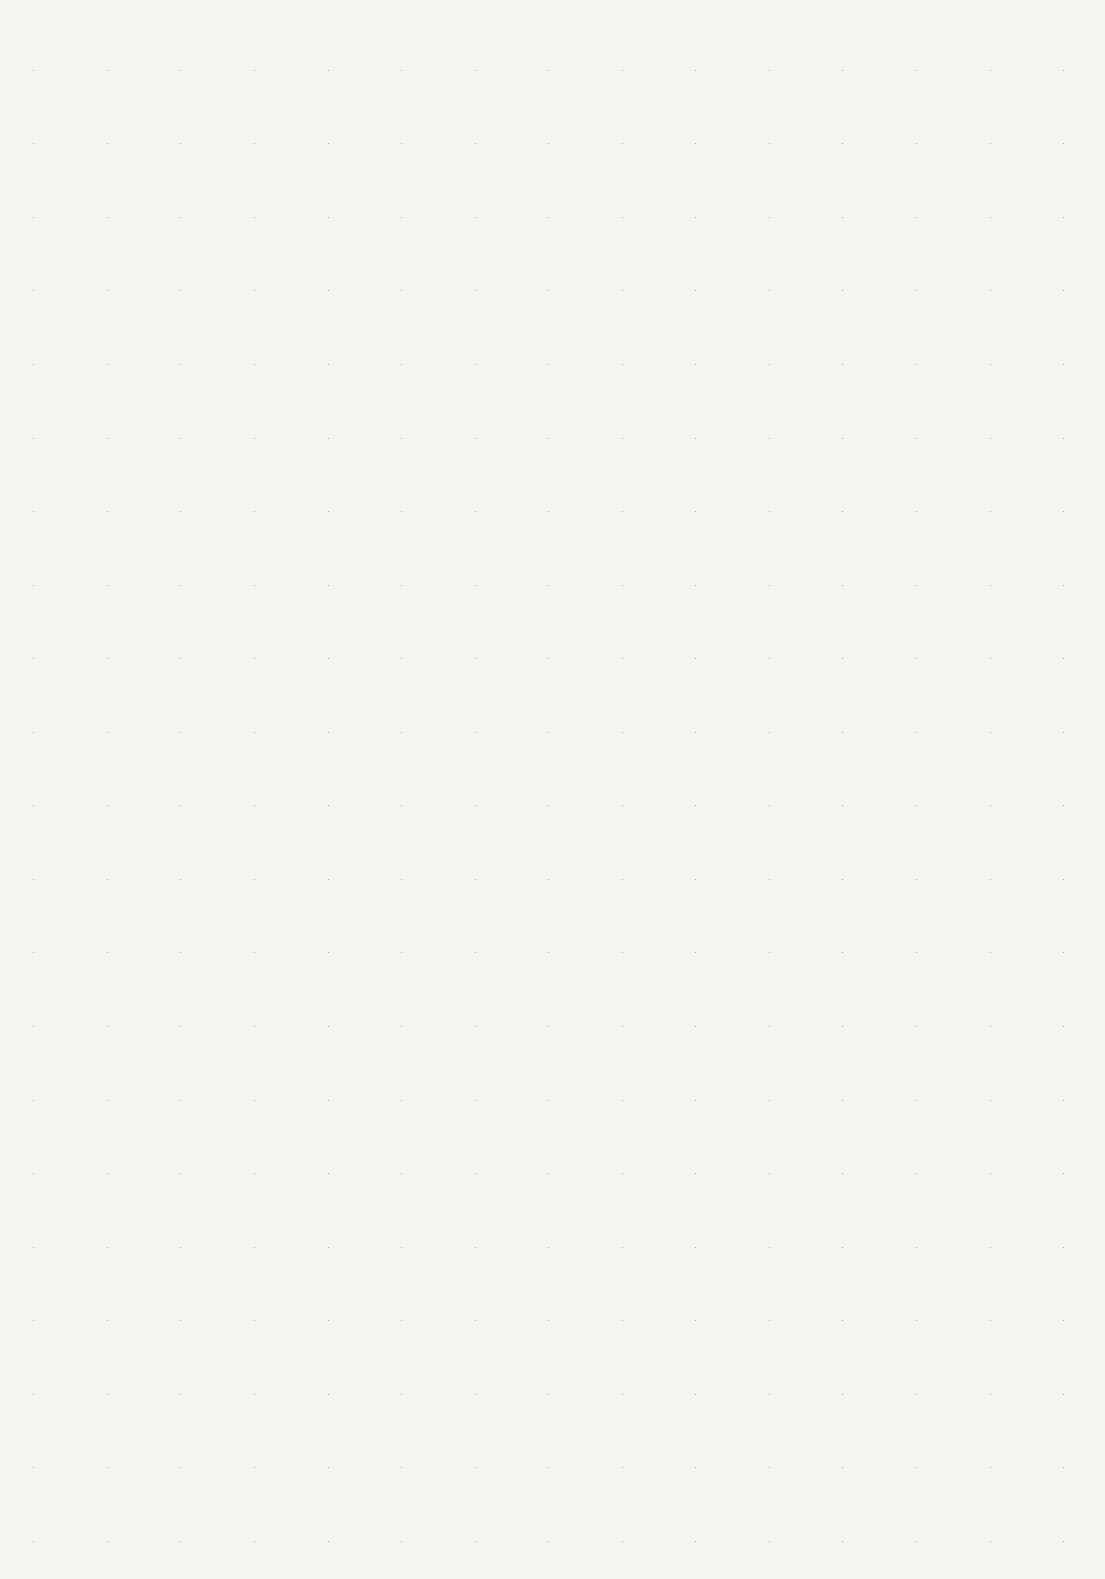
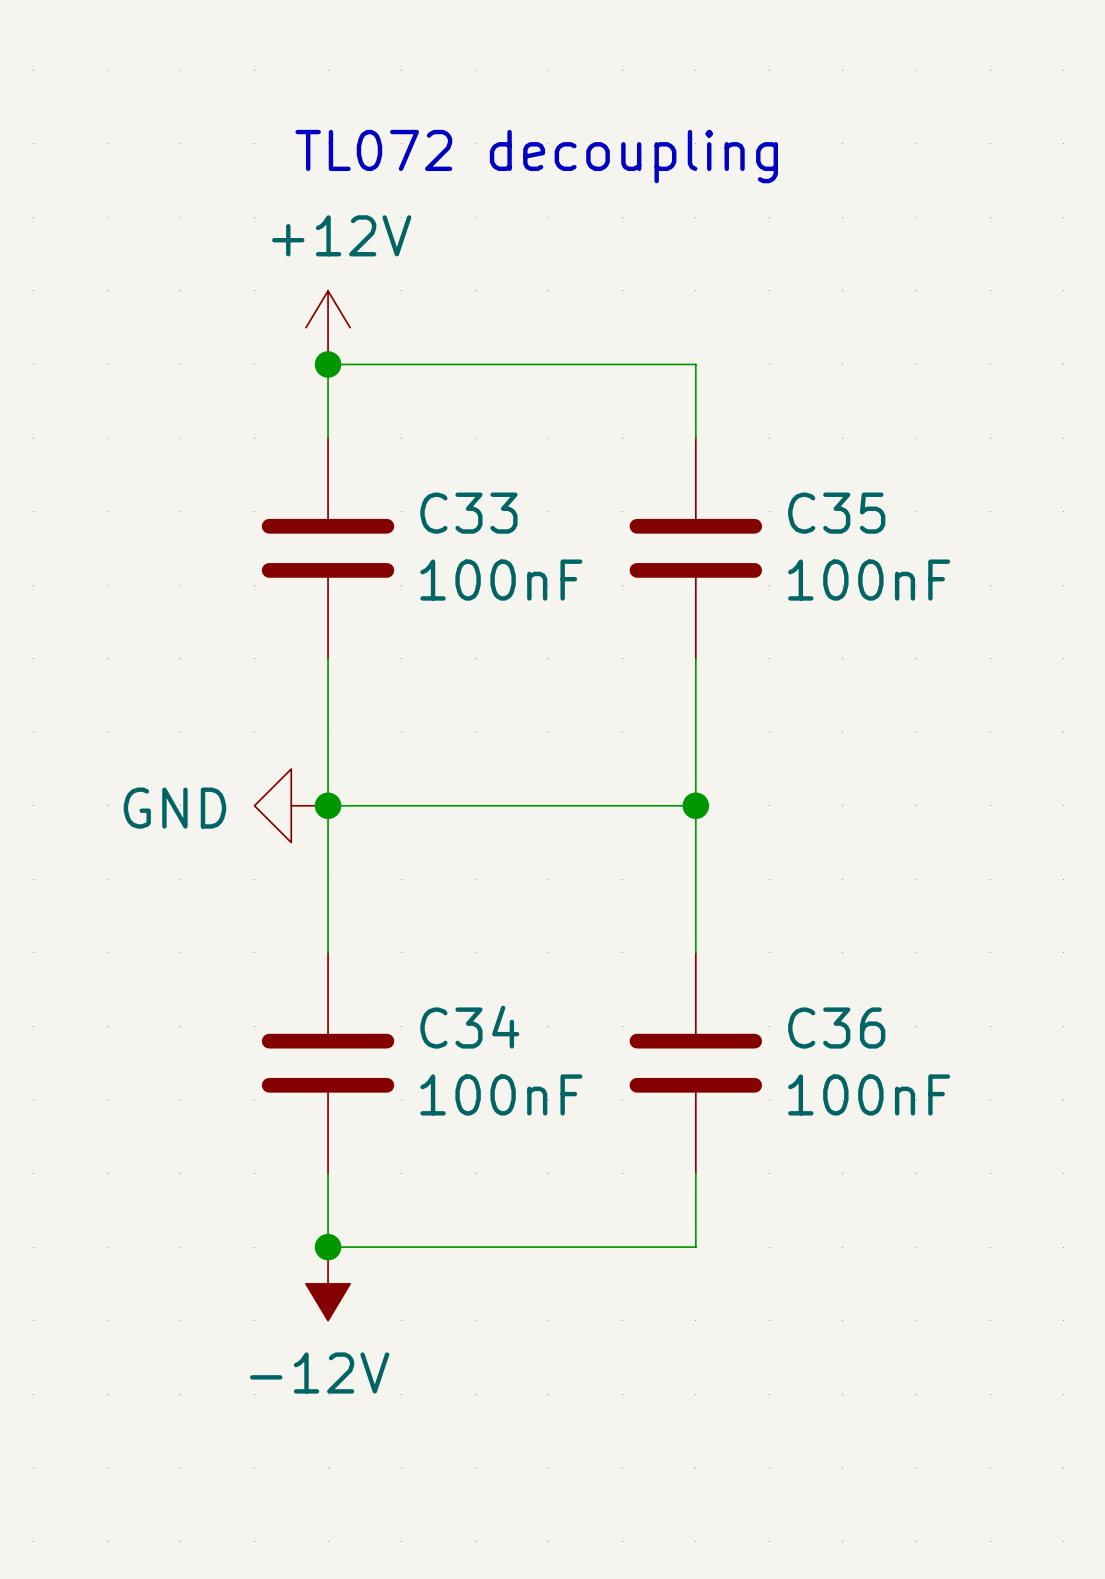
text: none -> TL072 decoupling (536, 156)
power symbol: none -> +12V (328, 327)
junction: none -> (328, 364)
wire: none -> (328, 438) (328, 364) (695, 364) (695, 438)
C33: none -> 100nF (328, 548)
C35: none -> 100nF (695, 548)
wire: none -> (328, 658) (328, 952)
wire: none -> (695, 658) (695, 952)
power symbol: none -> GND (291, 805)
wire: none -> (328, 805) (695, 805)
junction: none -> (328, 805)
junction: none -> (695, 805)
C34: none -> 100nF (328, 1063)
C36: none -> 100nF (695, 1063)
wire: none -> (328, 1173) (328, 1247) (695, 1247) (695, 1173)
junction: none -> (328, 1247)
power symbol: none -> -12V (328, 1283)

